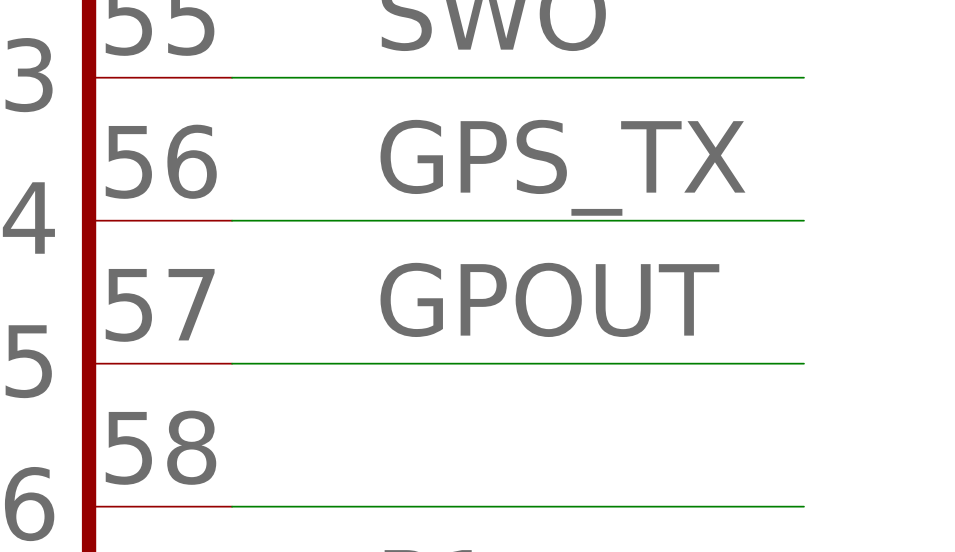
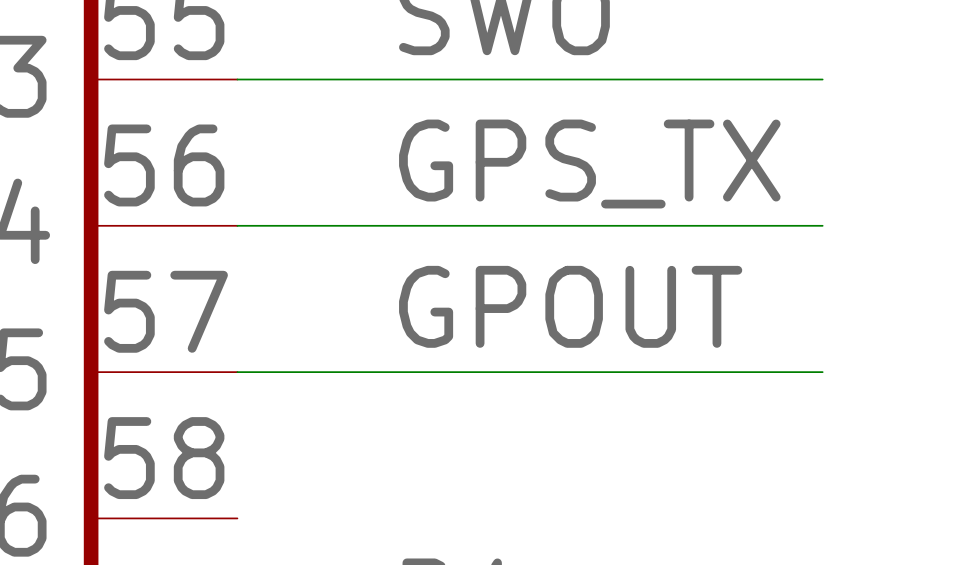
wire: (232, 506) (803, 506) -> none

